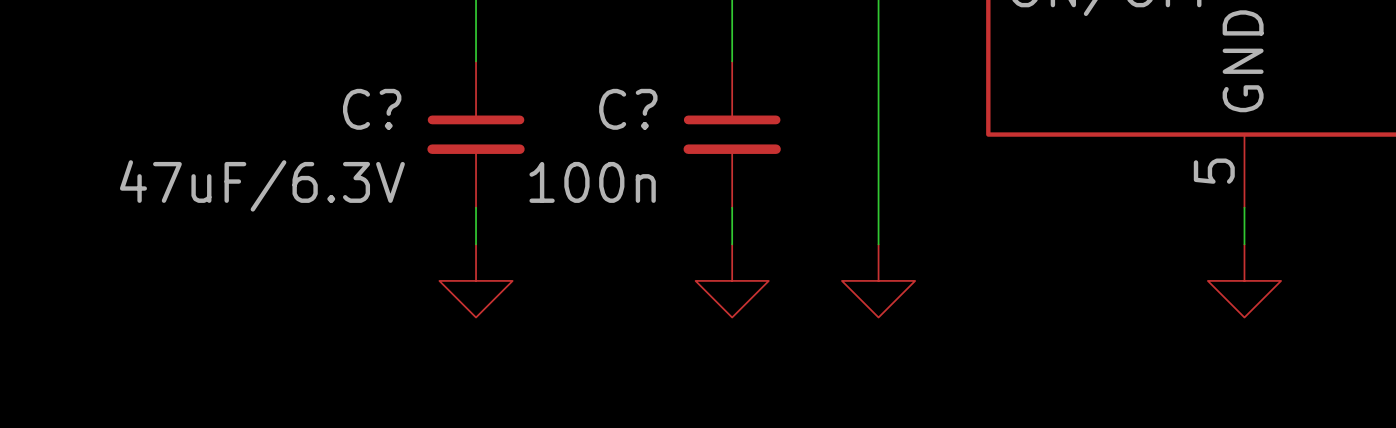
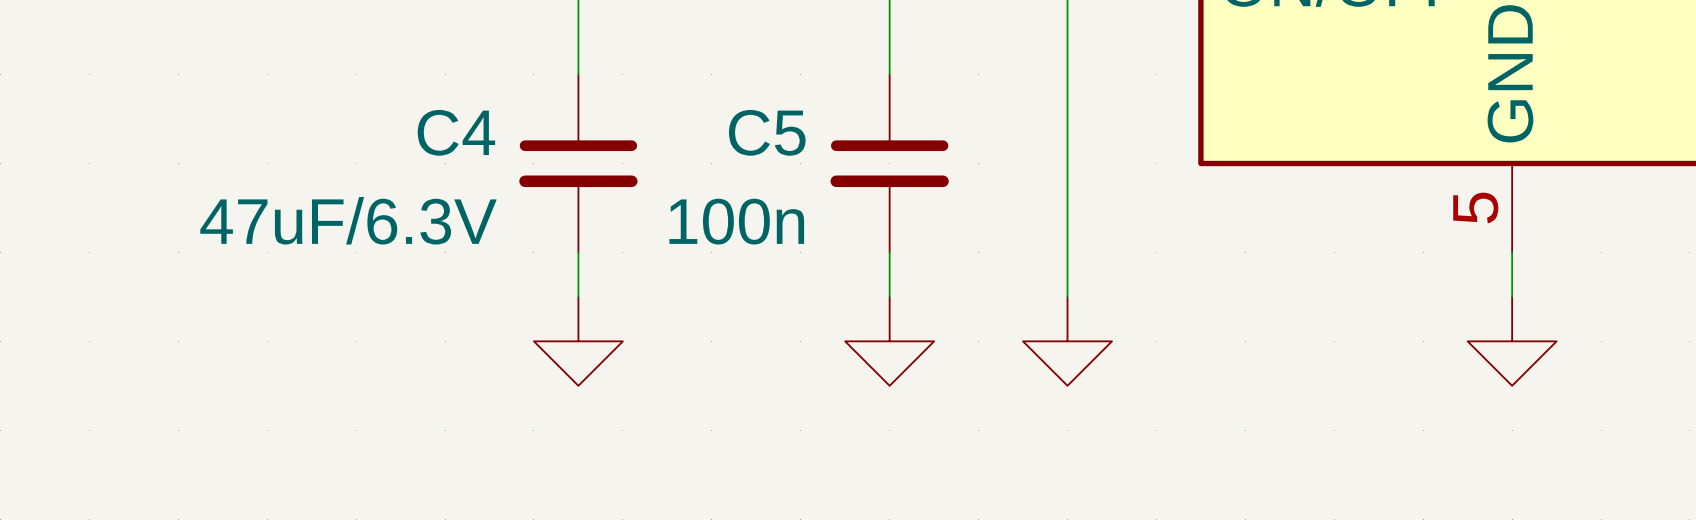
C? name: C? (372, 109) -> C4 (456, 132)
C? name: C? (628, 109) -> C5 (767, 132)

